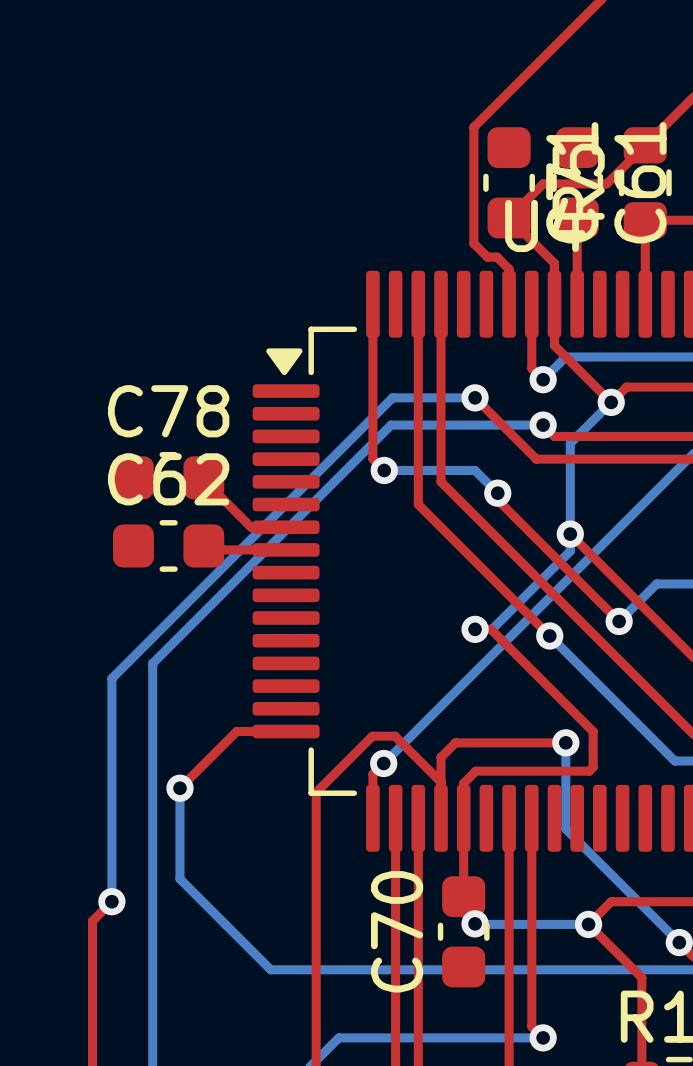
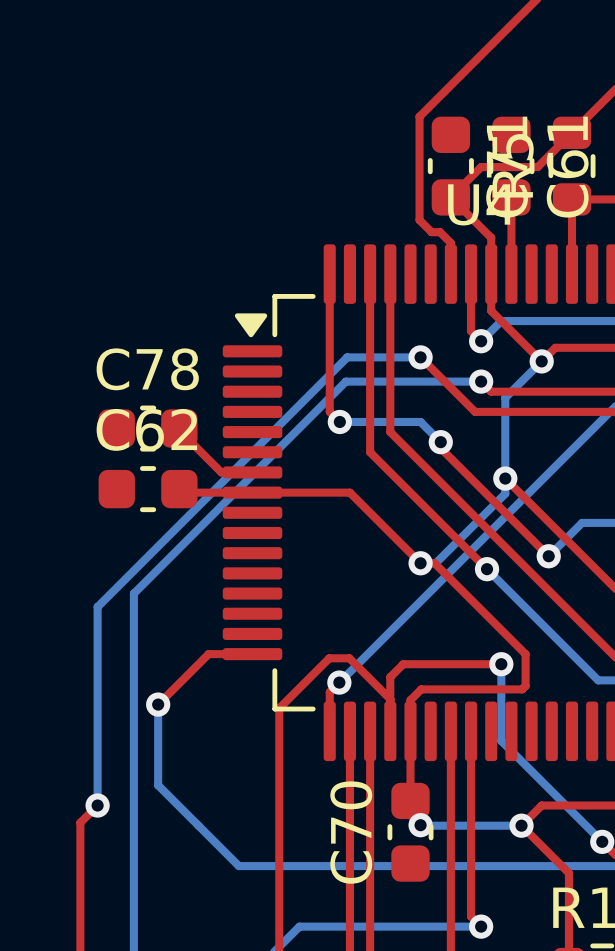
top track: none -> (252, 492) (349, 492) (420, 563)

